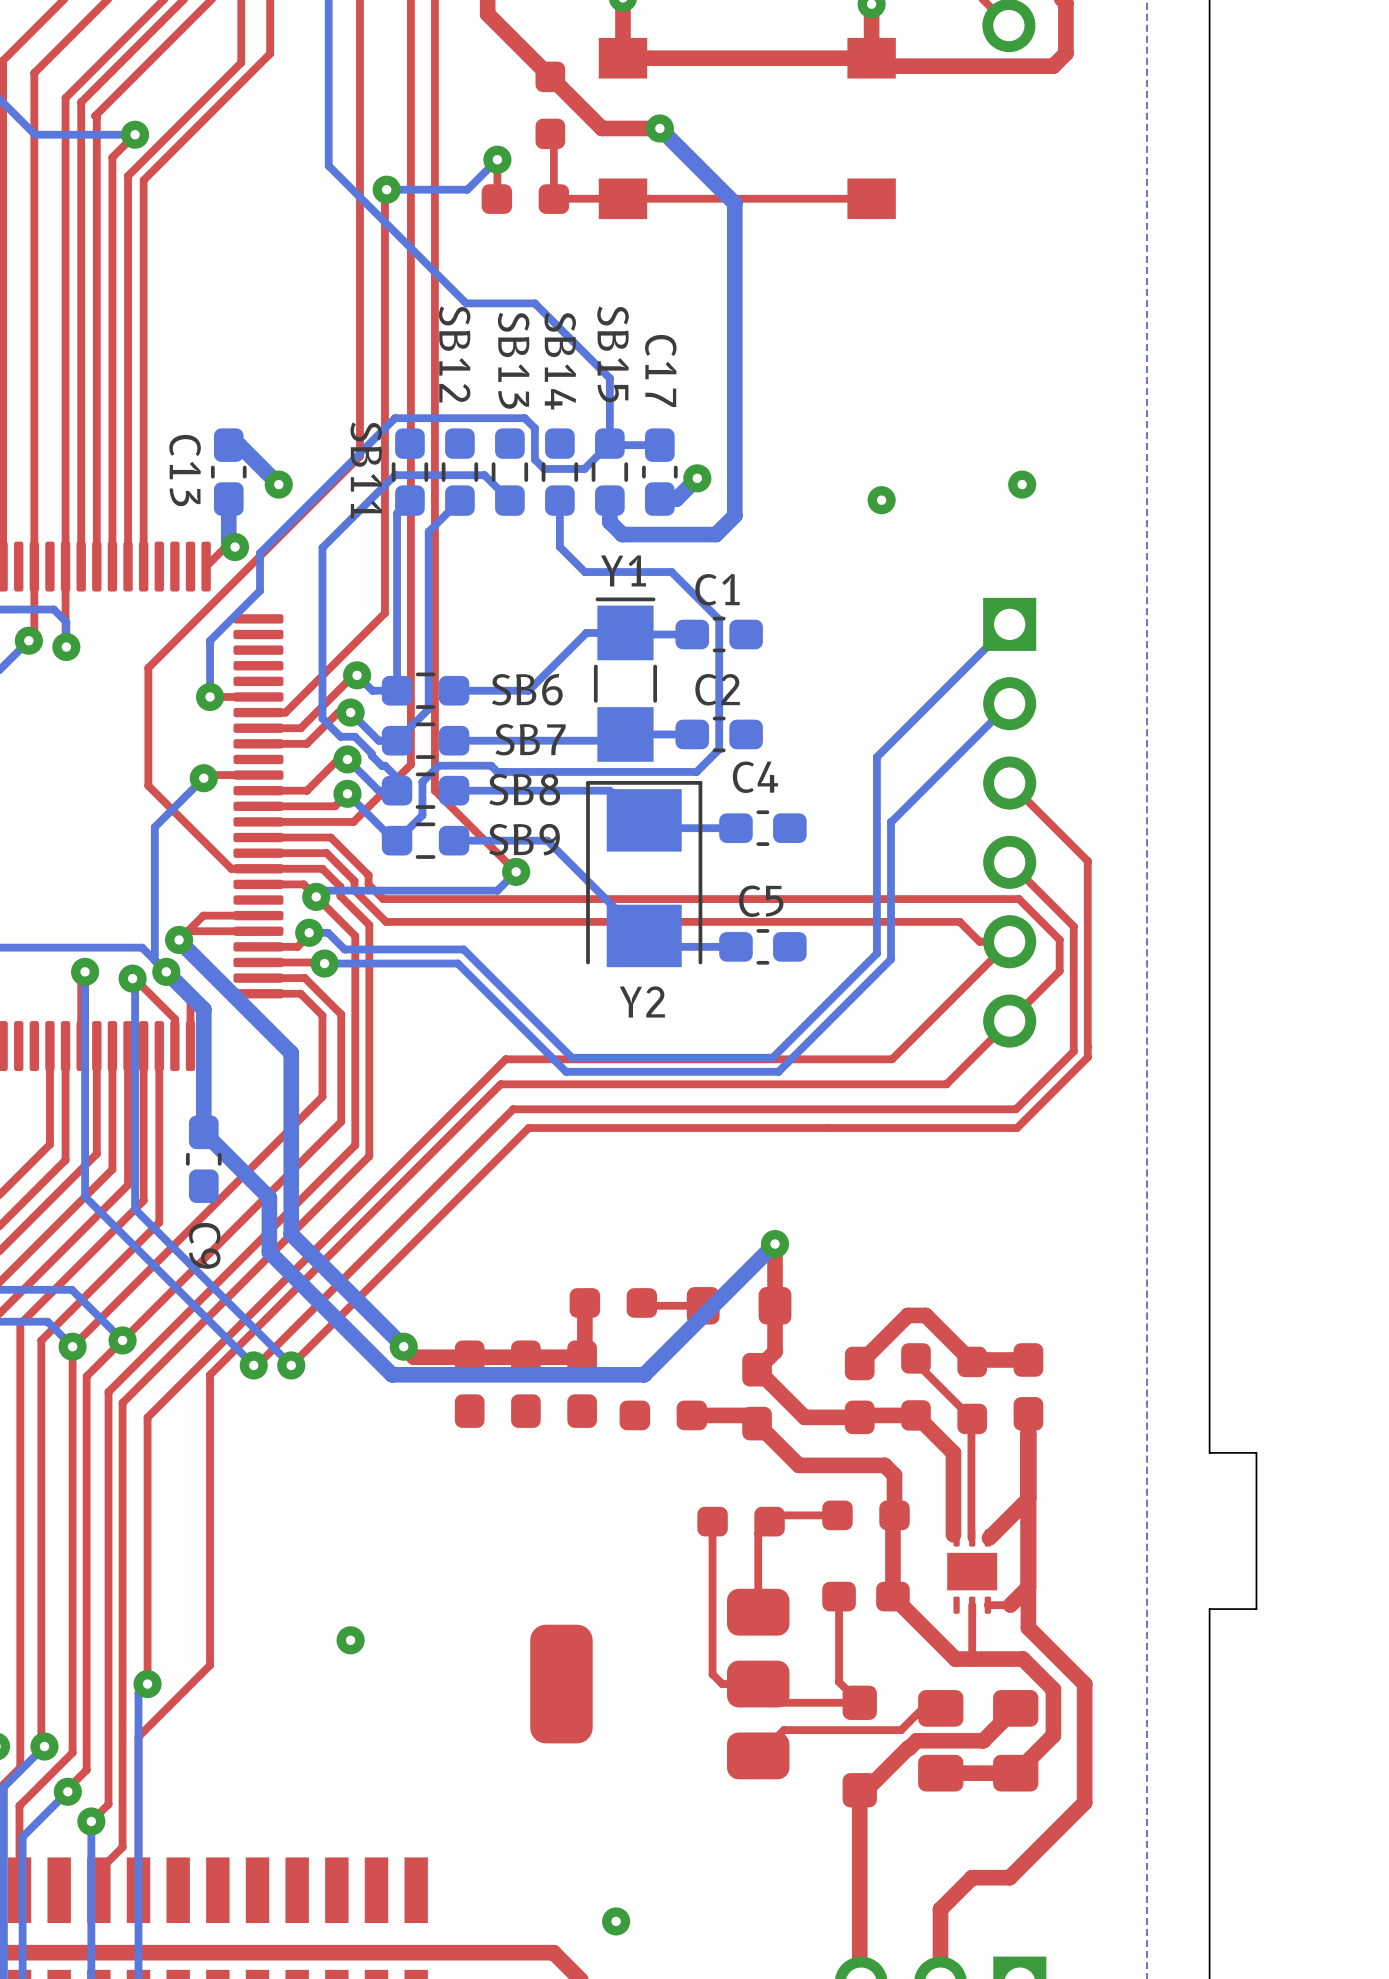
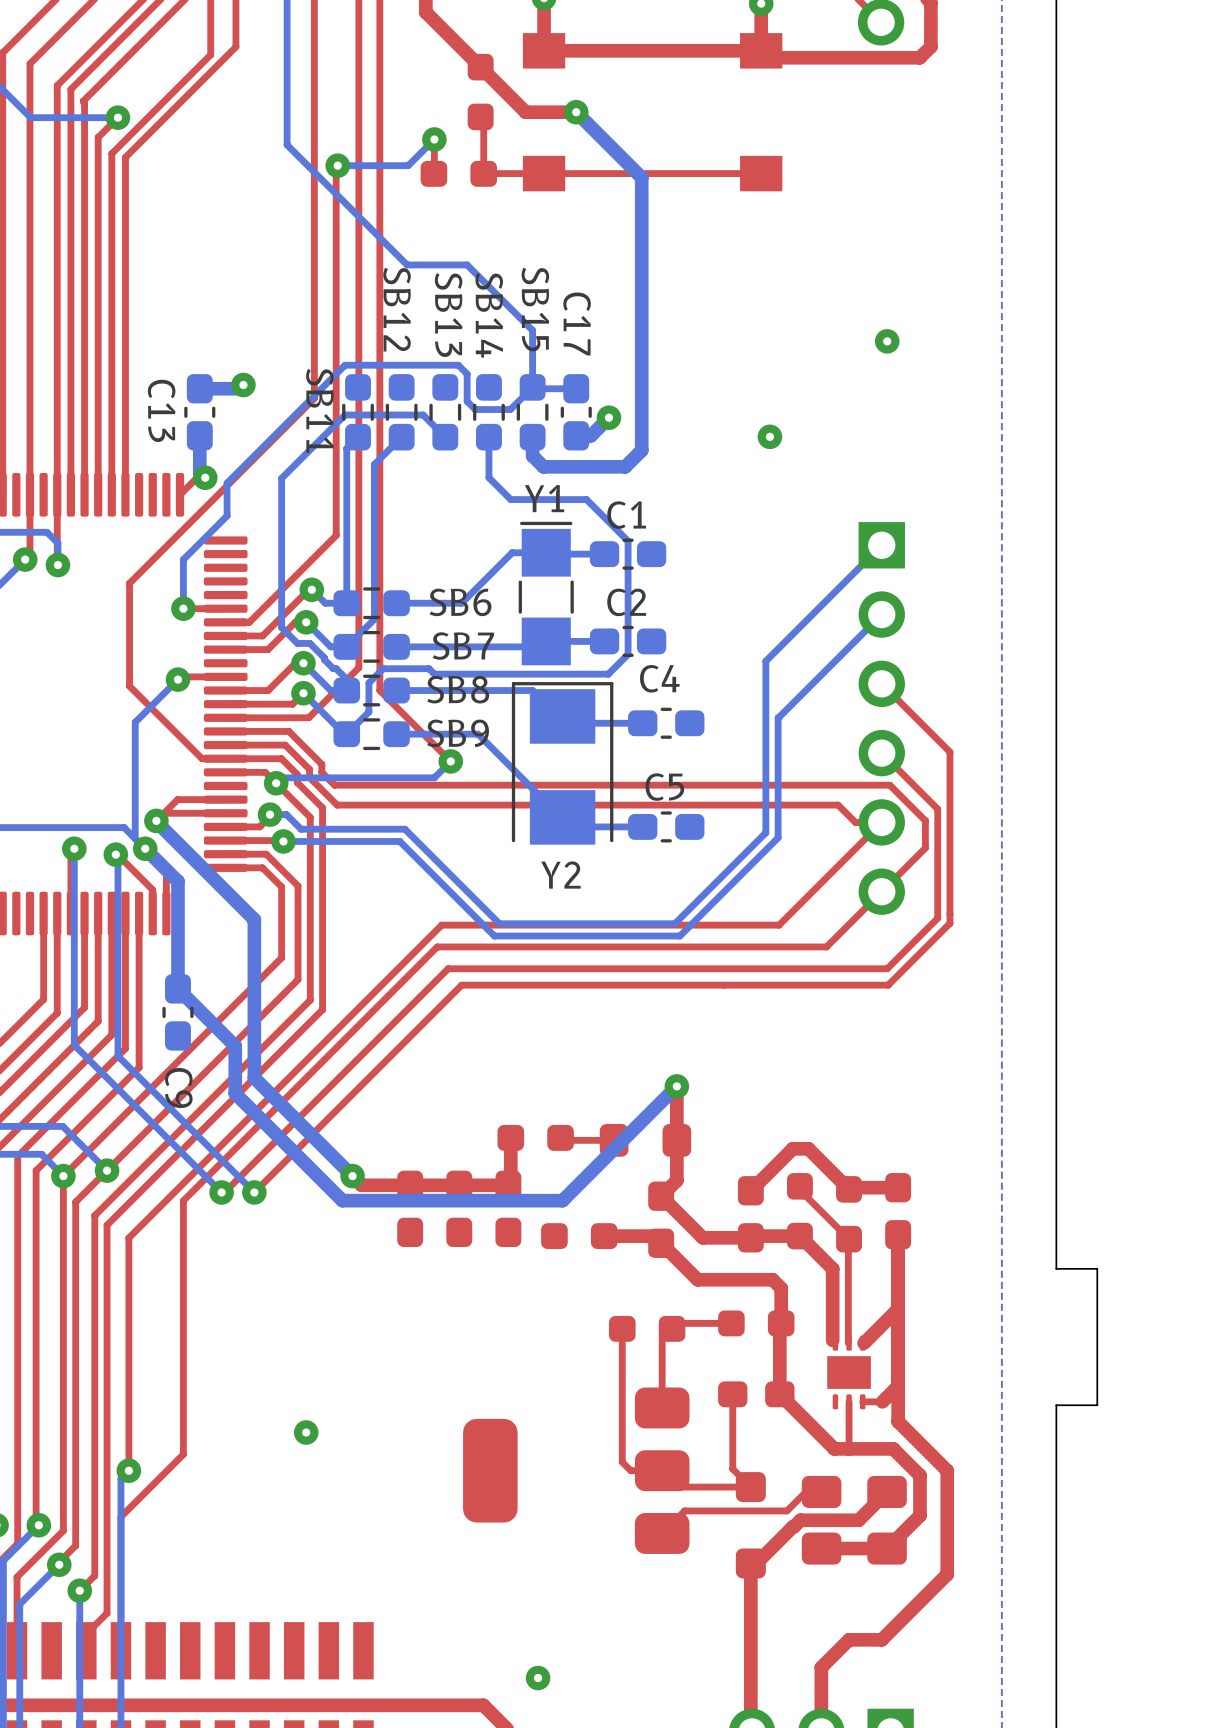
bottom track: (239, 445) (278, 484) -> (209, 388) (239, 388) (243, 385)
via position: (278, 484) -> (243, 385)
via position: (1022, 484) -> (887, 341)

